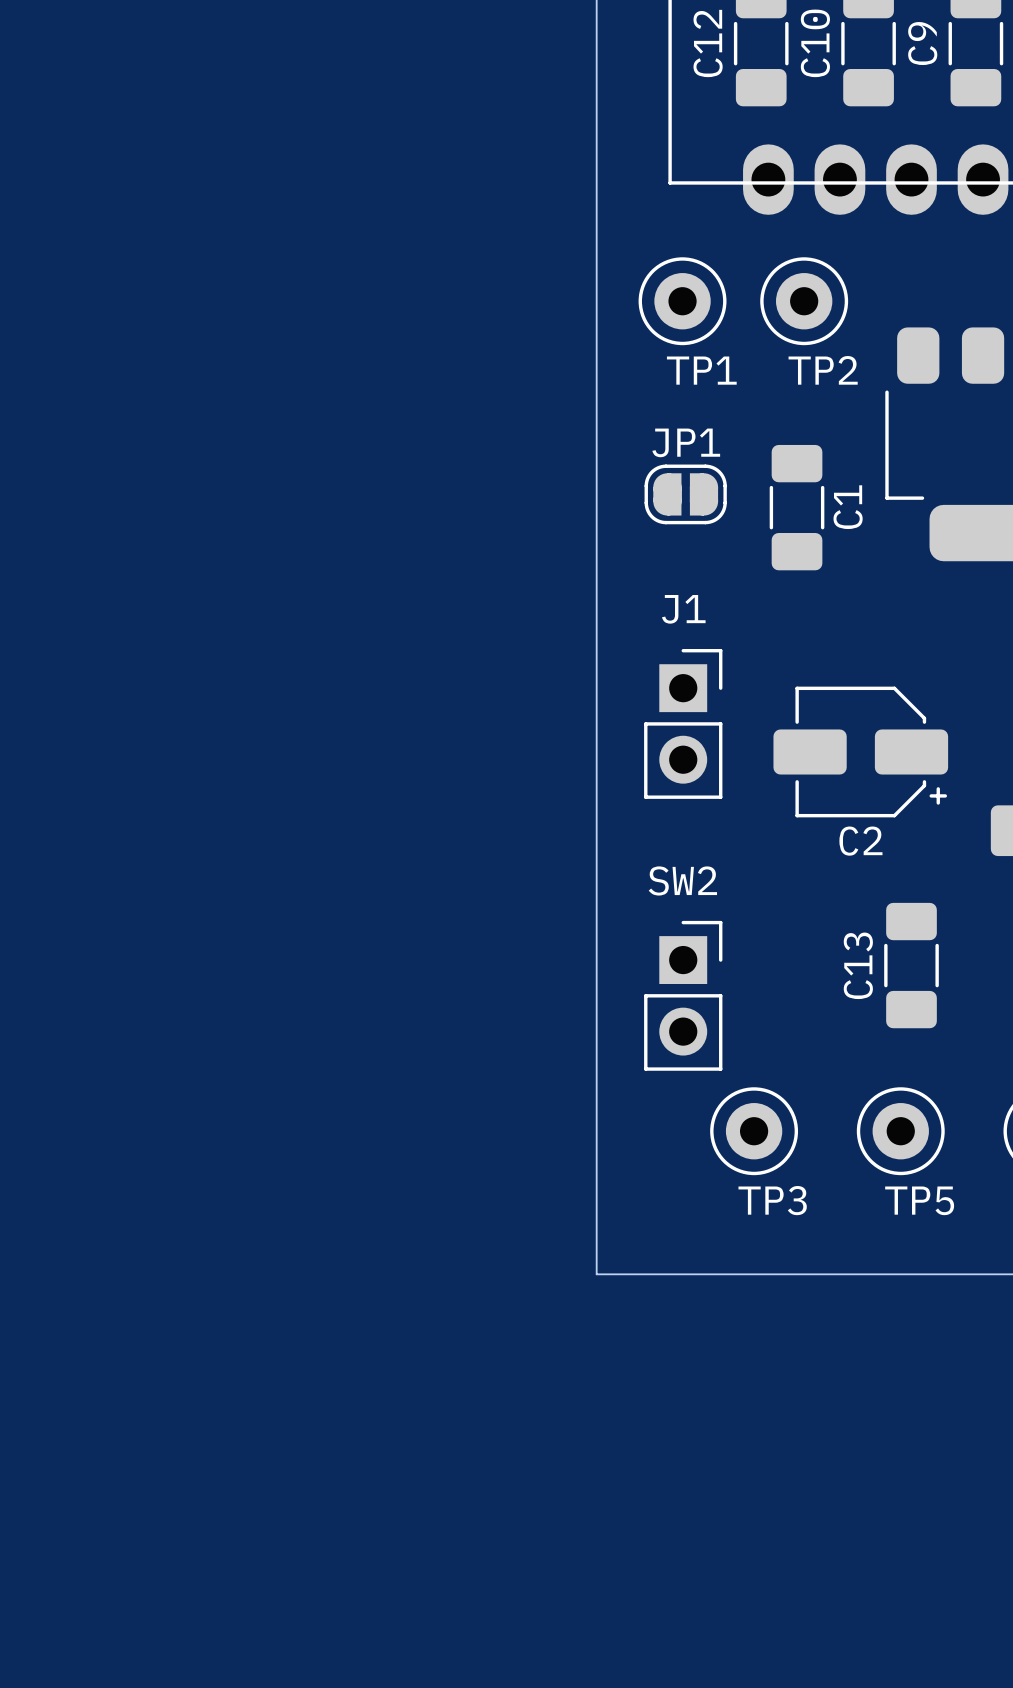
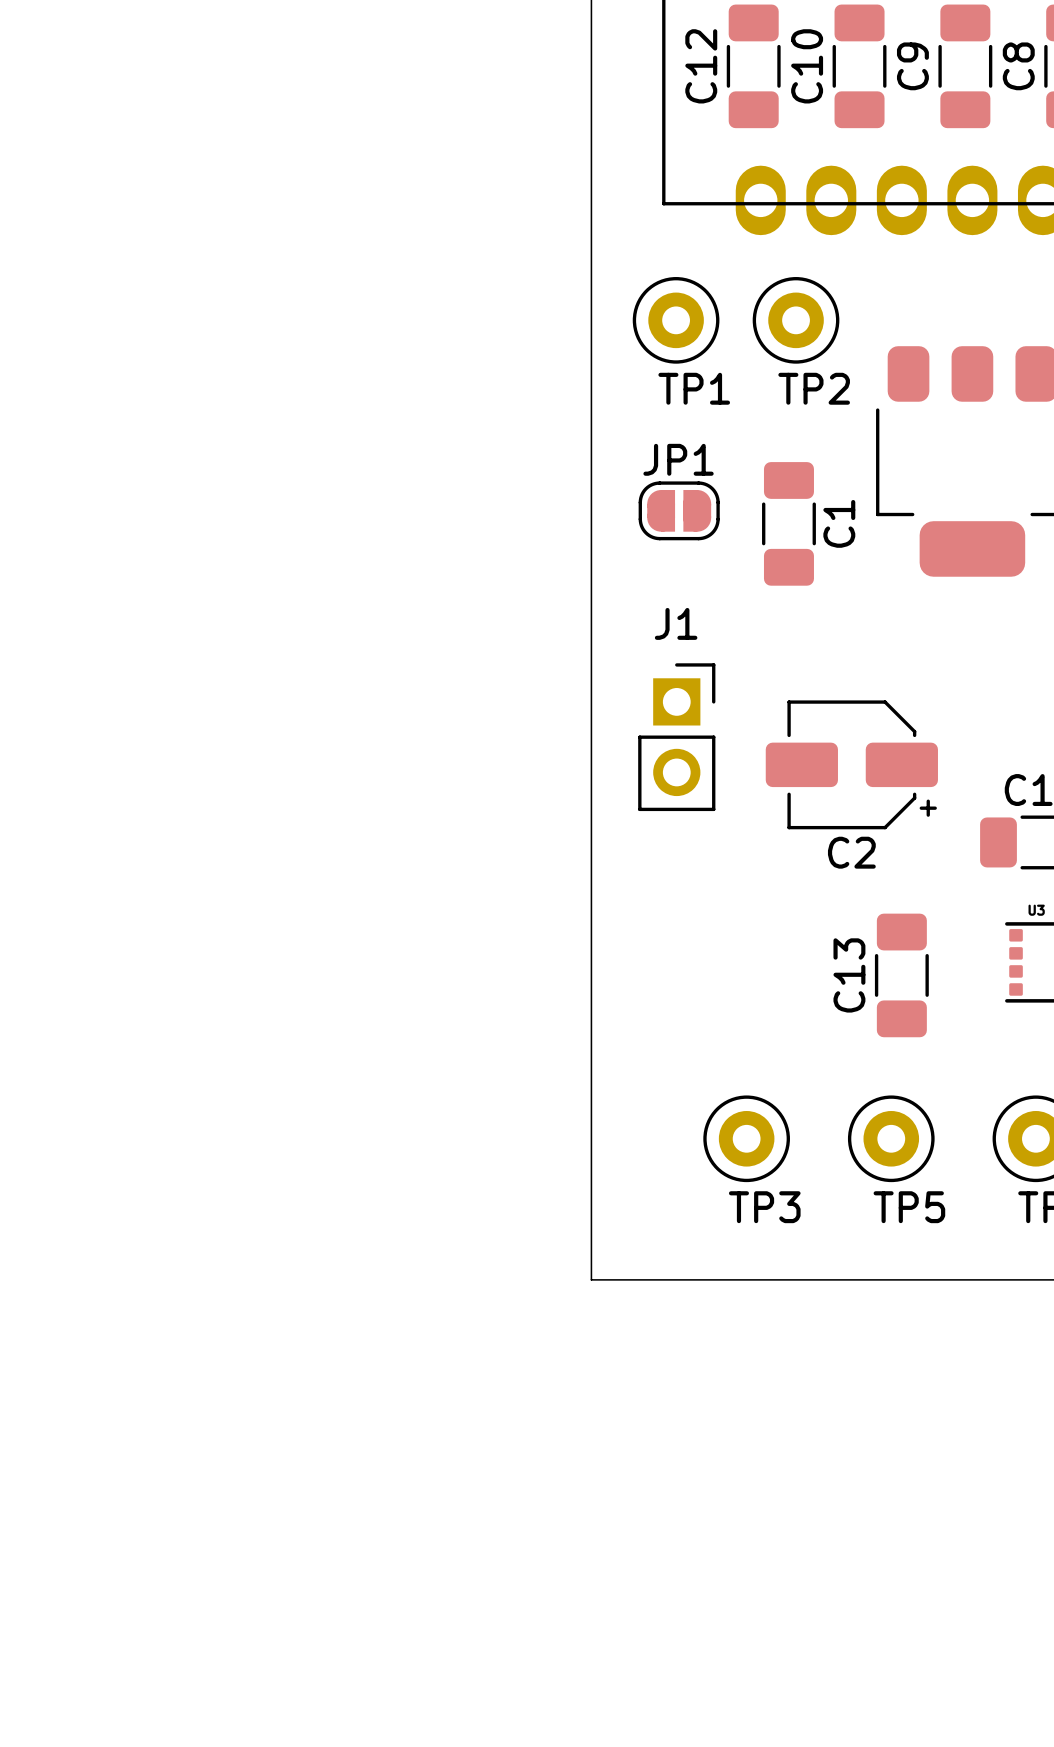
SW2: (683, 995) -> none

